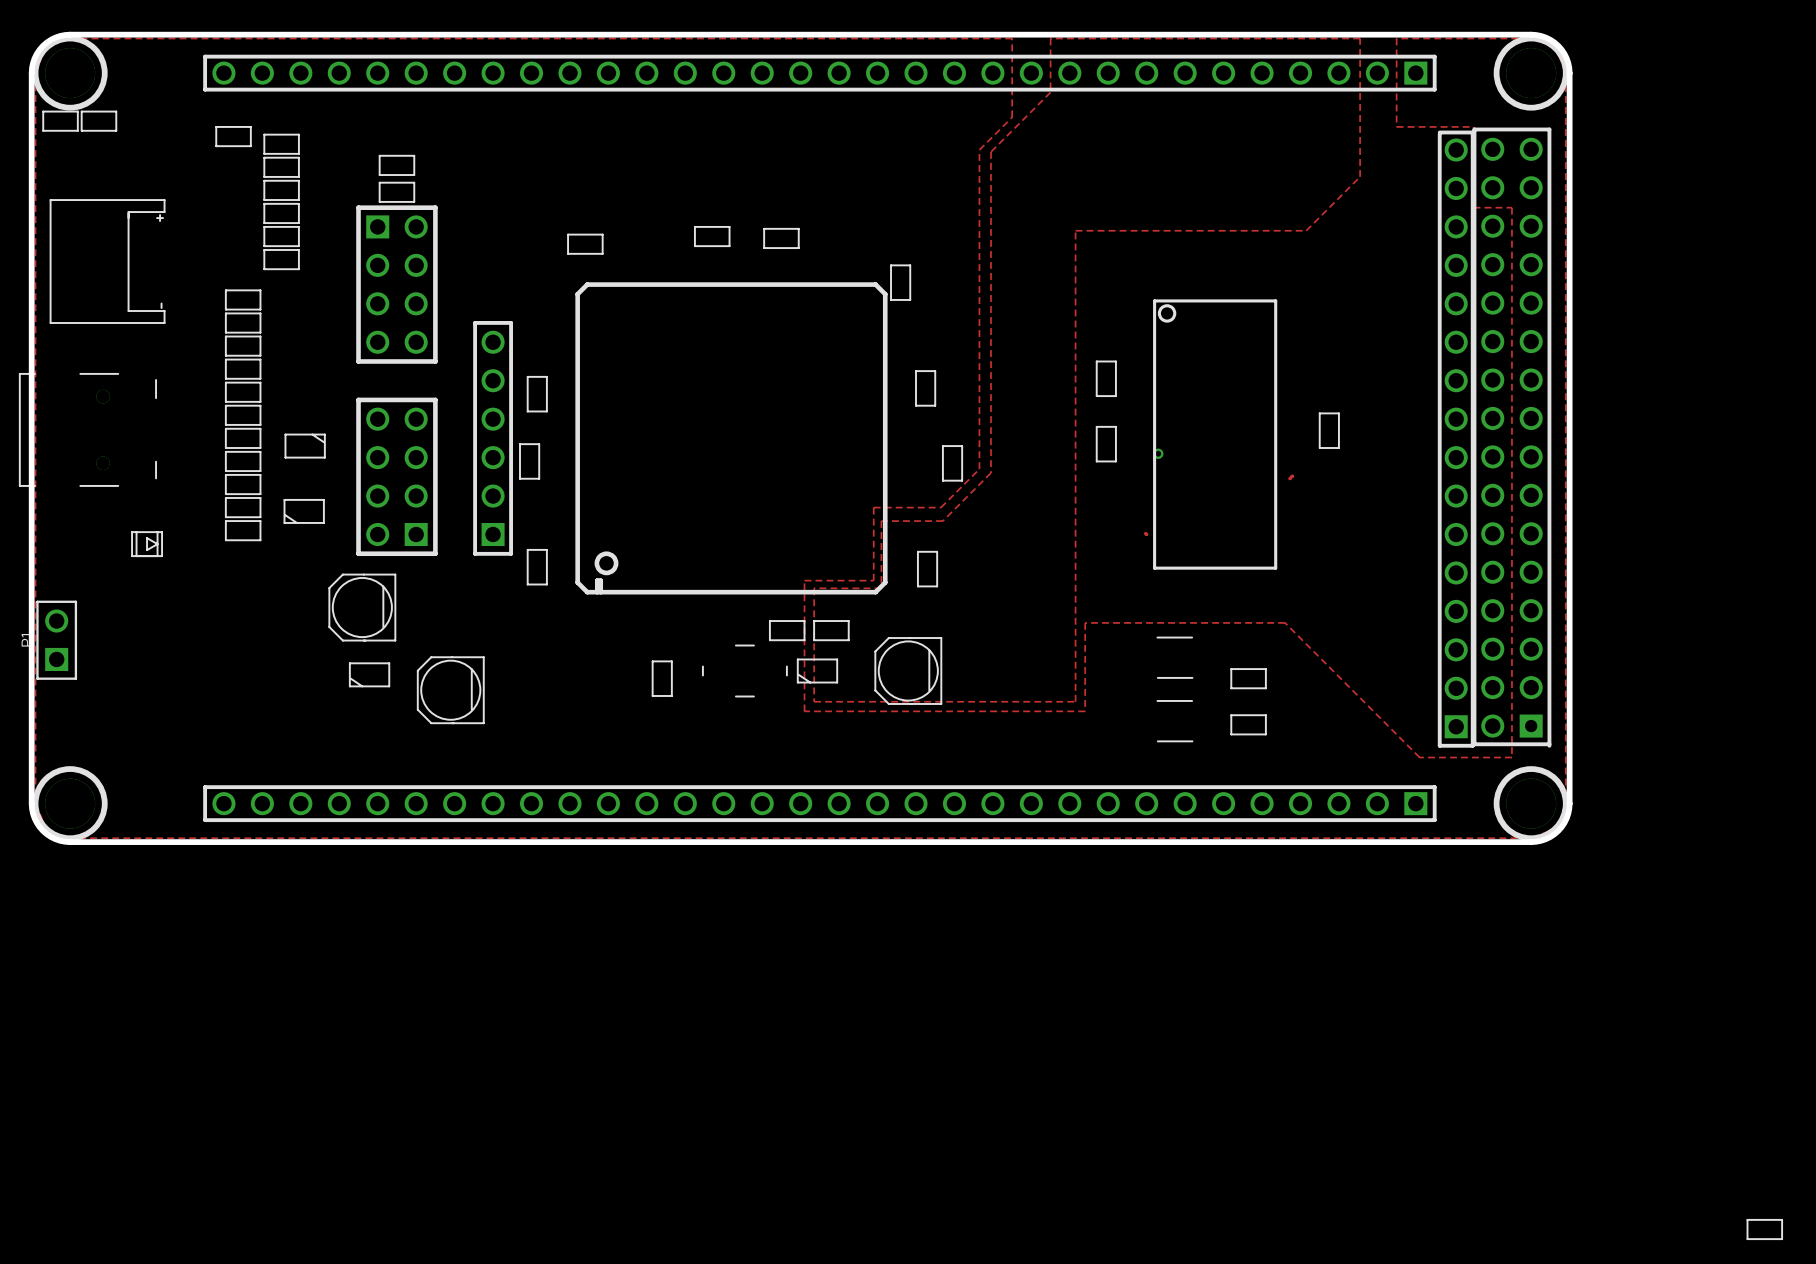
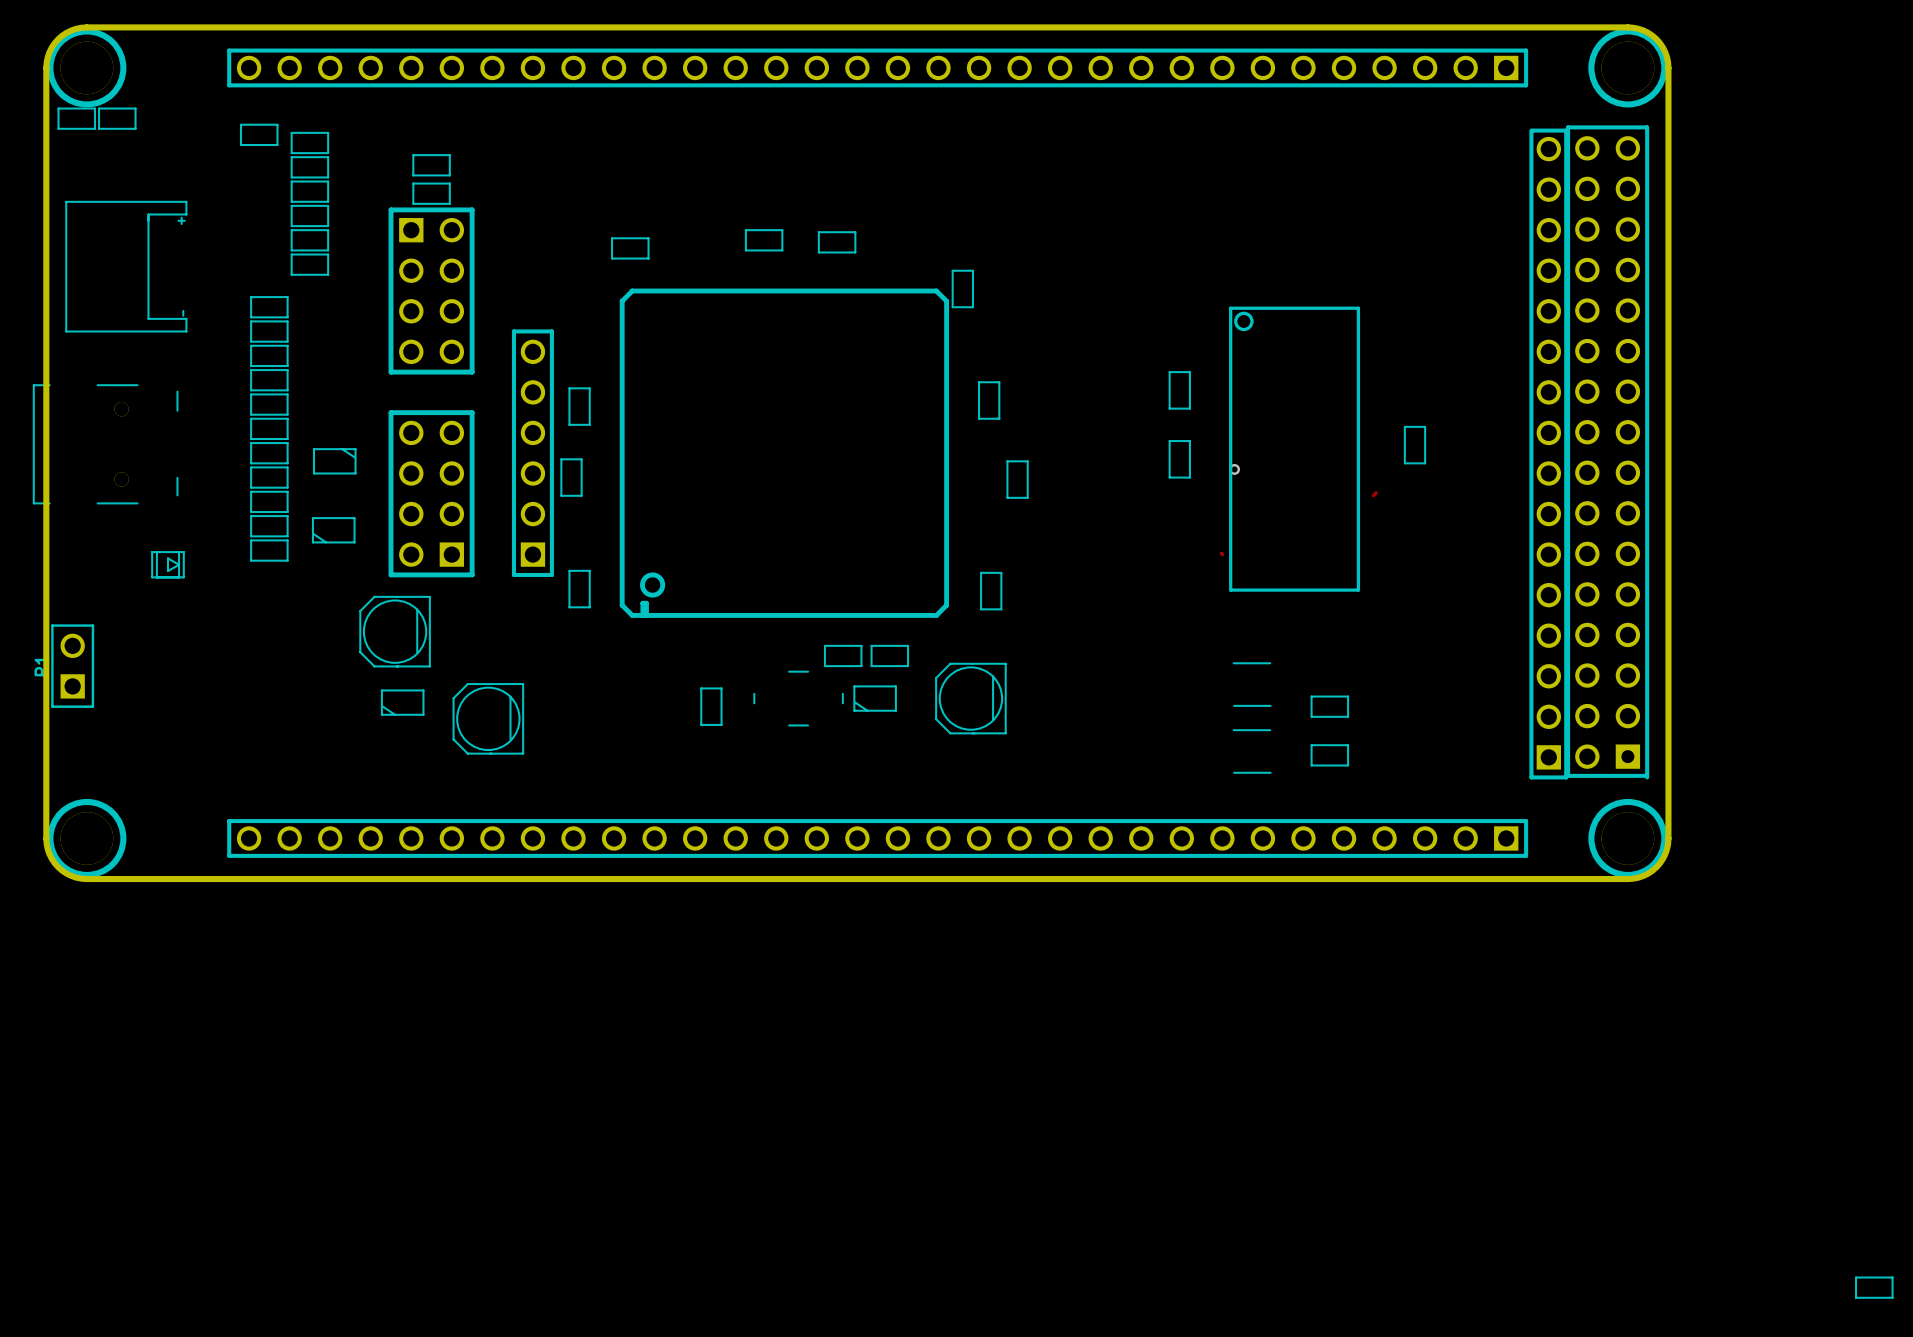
zone outline: (64, 38) (1012, 38) (1012, 117) (979, 150) (979, 469) (941, 507) (873, 507) (873, 580) (804, 580) (804, 711) (1085, 711) (1085, 622) (1285, 622) (1419, 757) (1511, 757) (1511, 207) (1473, 207) (1473, 126) (1396, 126) (1396, 38) (1529, 38) (1554, 46) (1565, 71) (1565, 807) (1558, 826) (1533, 838) (68, 838) (47, 830) (35, 803) (35, 73) (45, 48) (64, 38) -> none
zone outline: (1050, 38) (1360, 38) (1360, 176) (1306, 230) (1075, 230) (1075, 701) (814, 701) (814, 588) (881, 588) (881, 521) (942, 521) (990, 472) (990, 151) (1050, 92) (1050, 38) -> none

